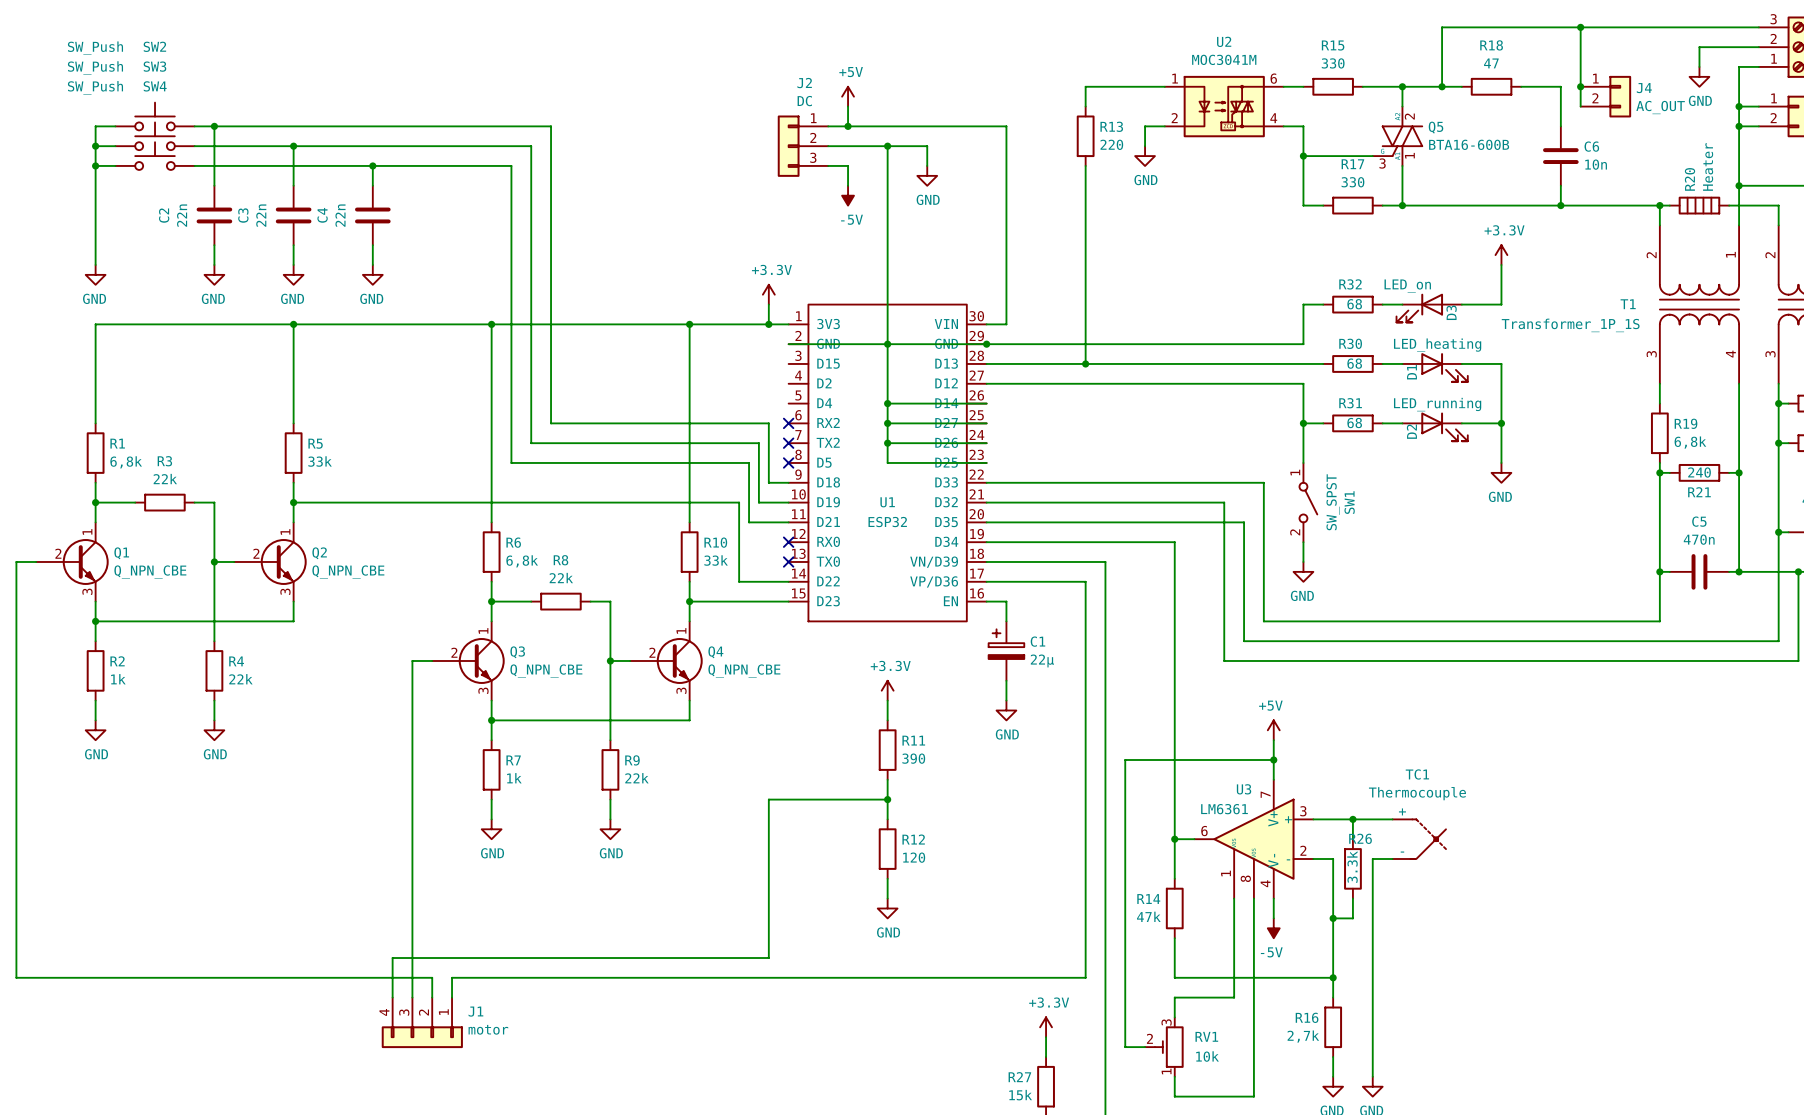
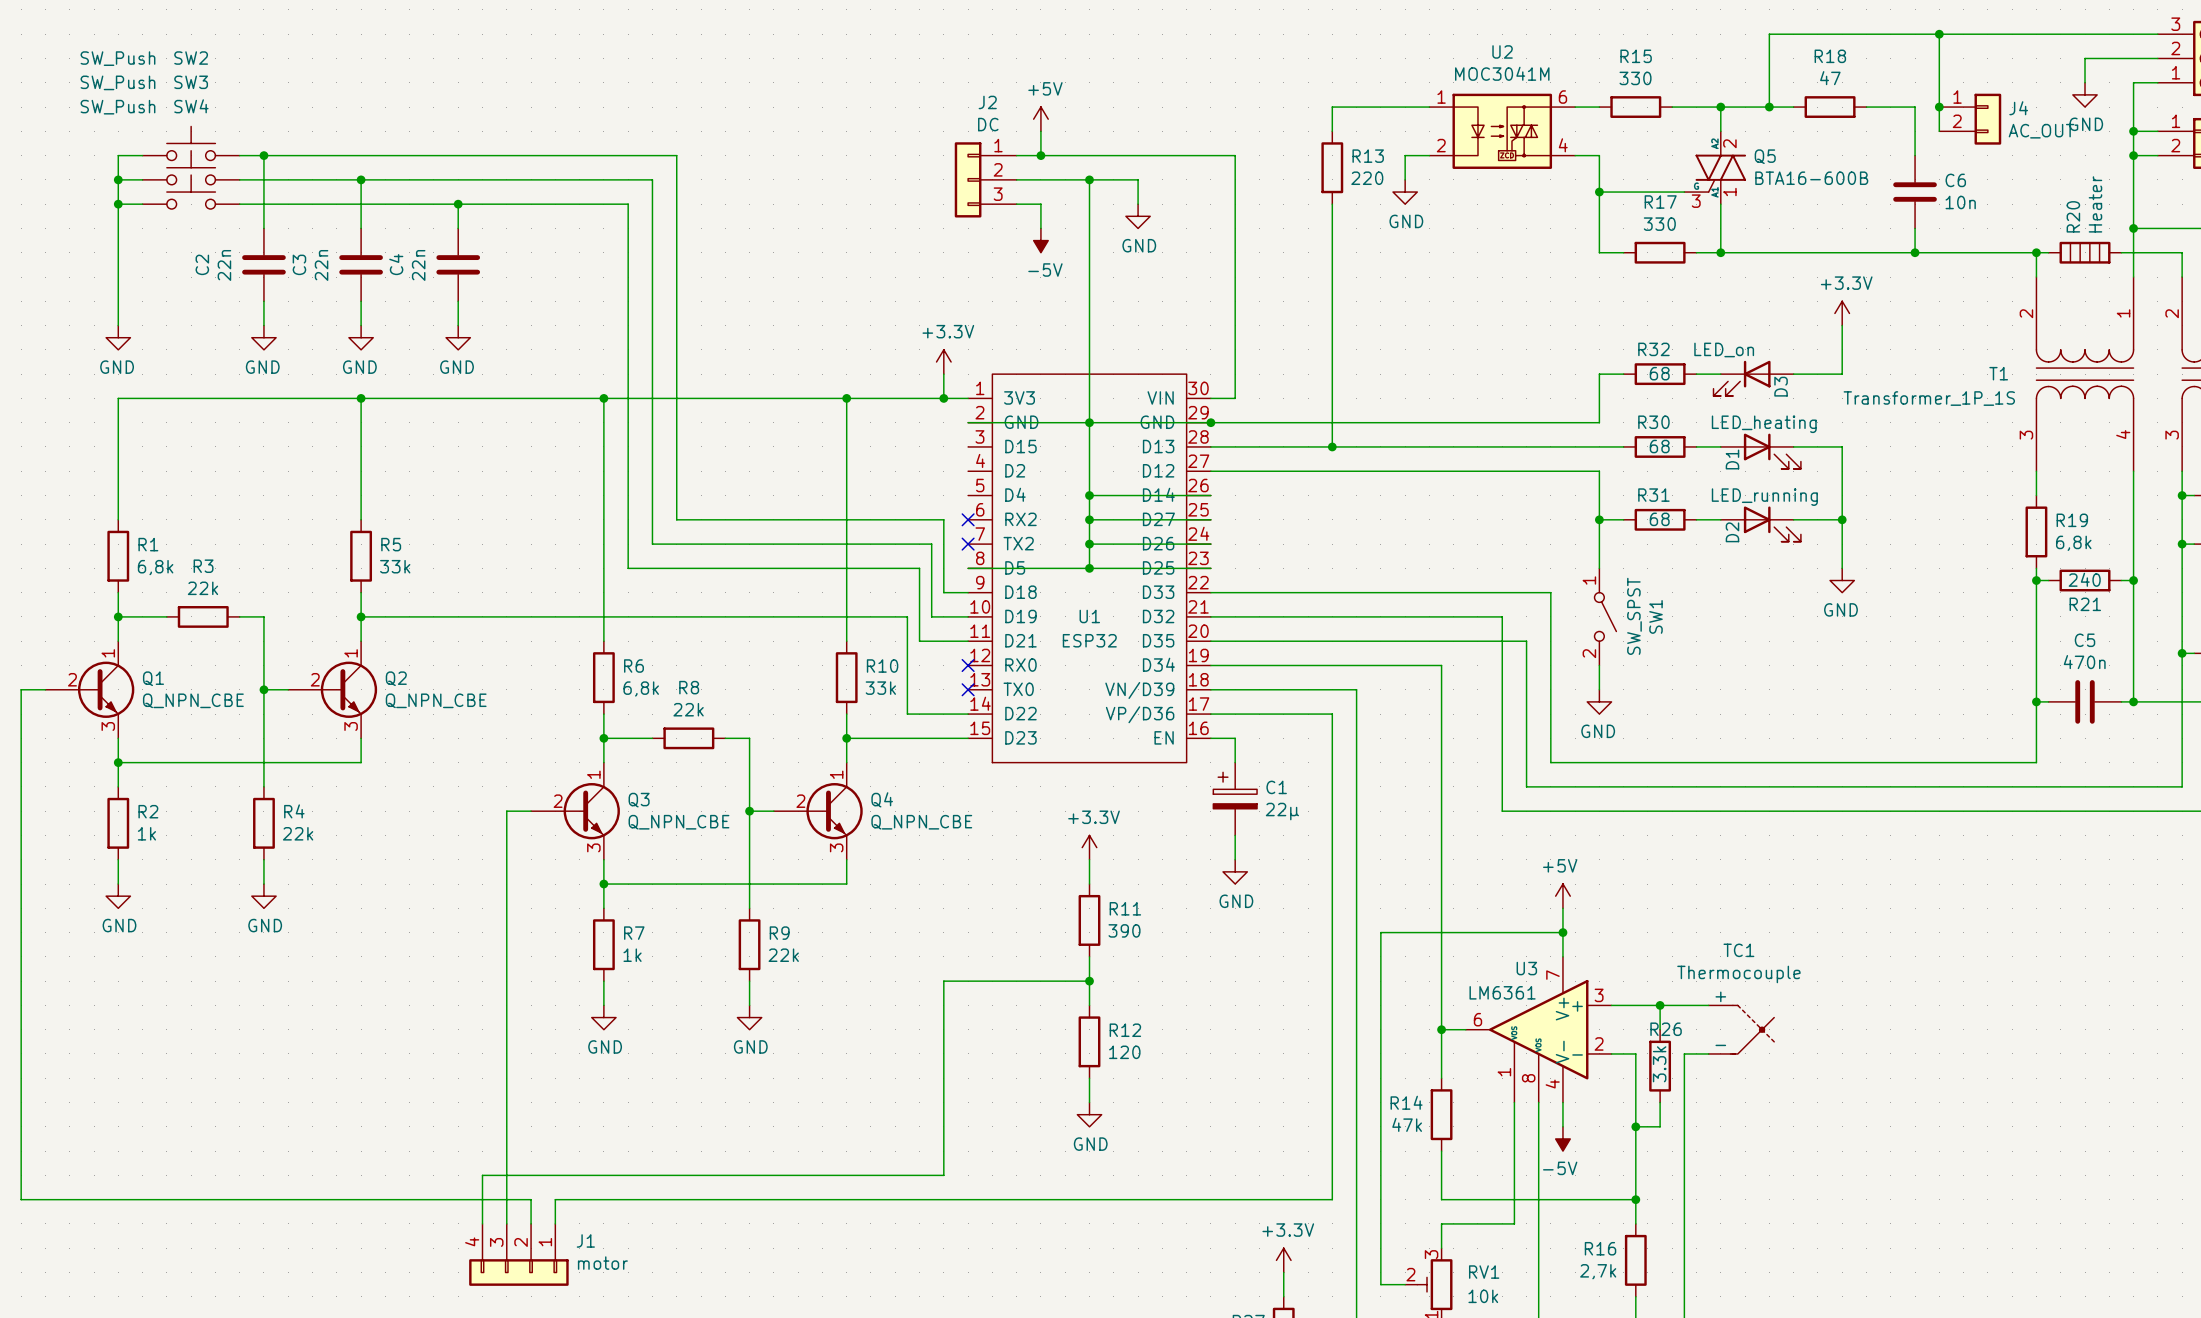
wire: none -> (968, 568) (1089, 568)
no-connect mark: (788, 462) -> none
junction: none -> (1089, 568)

